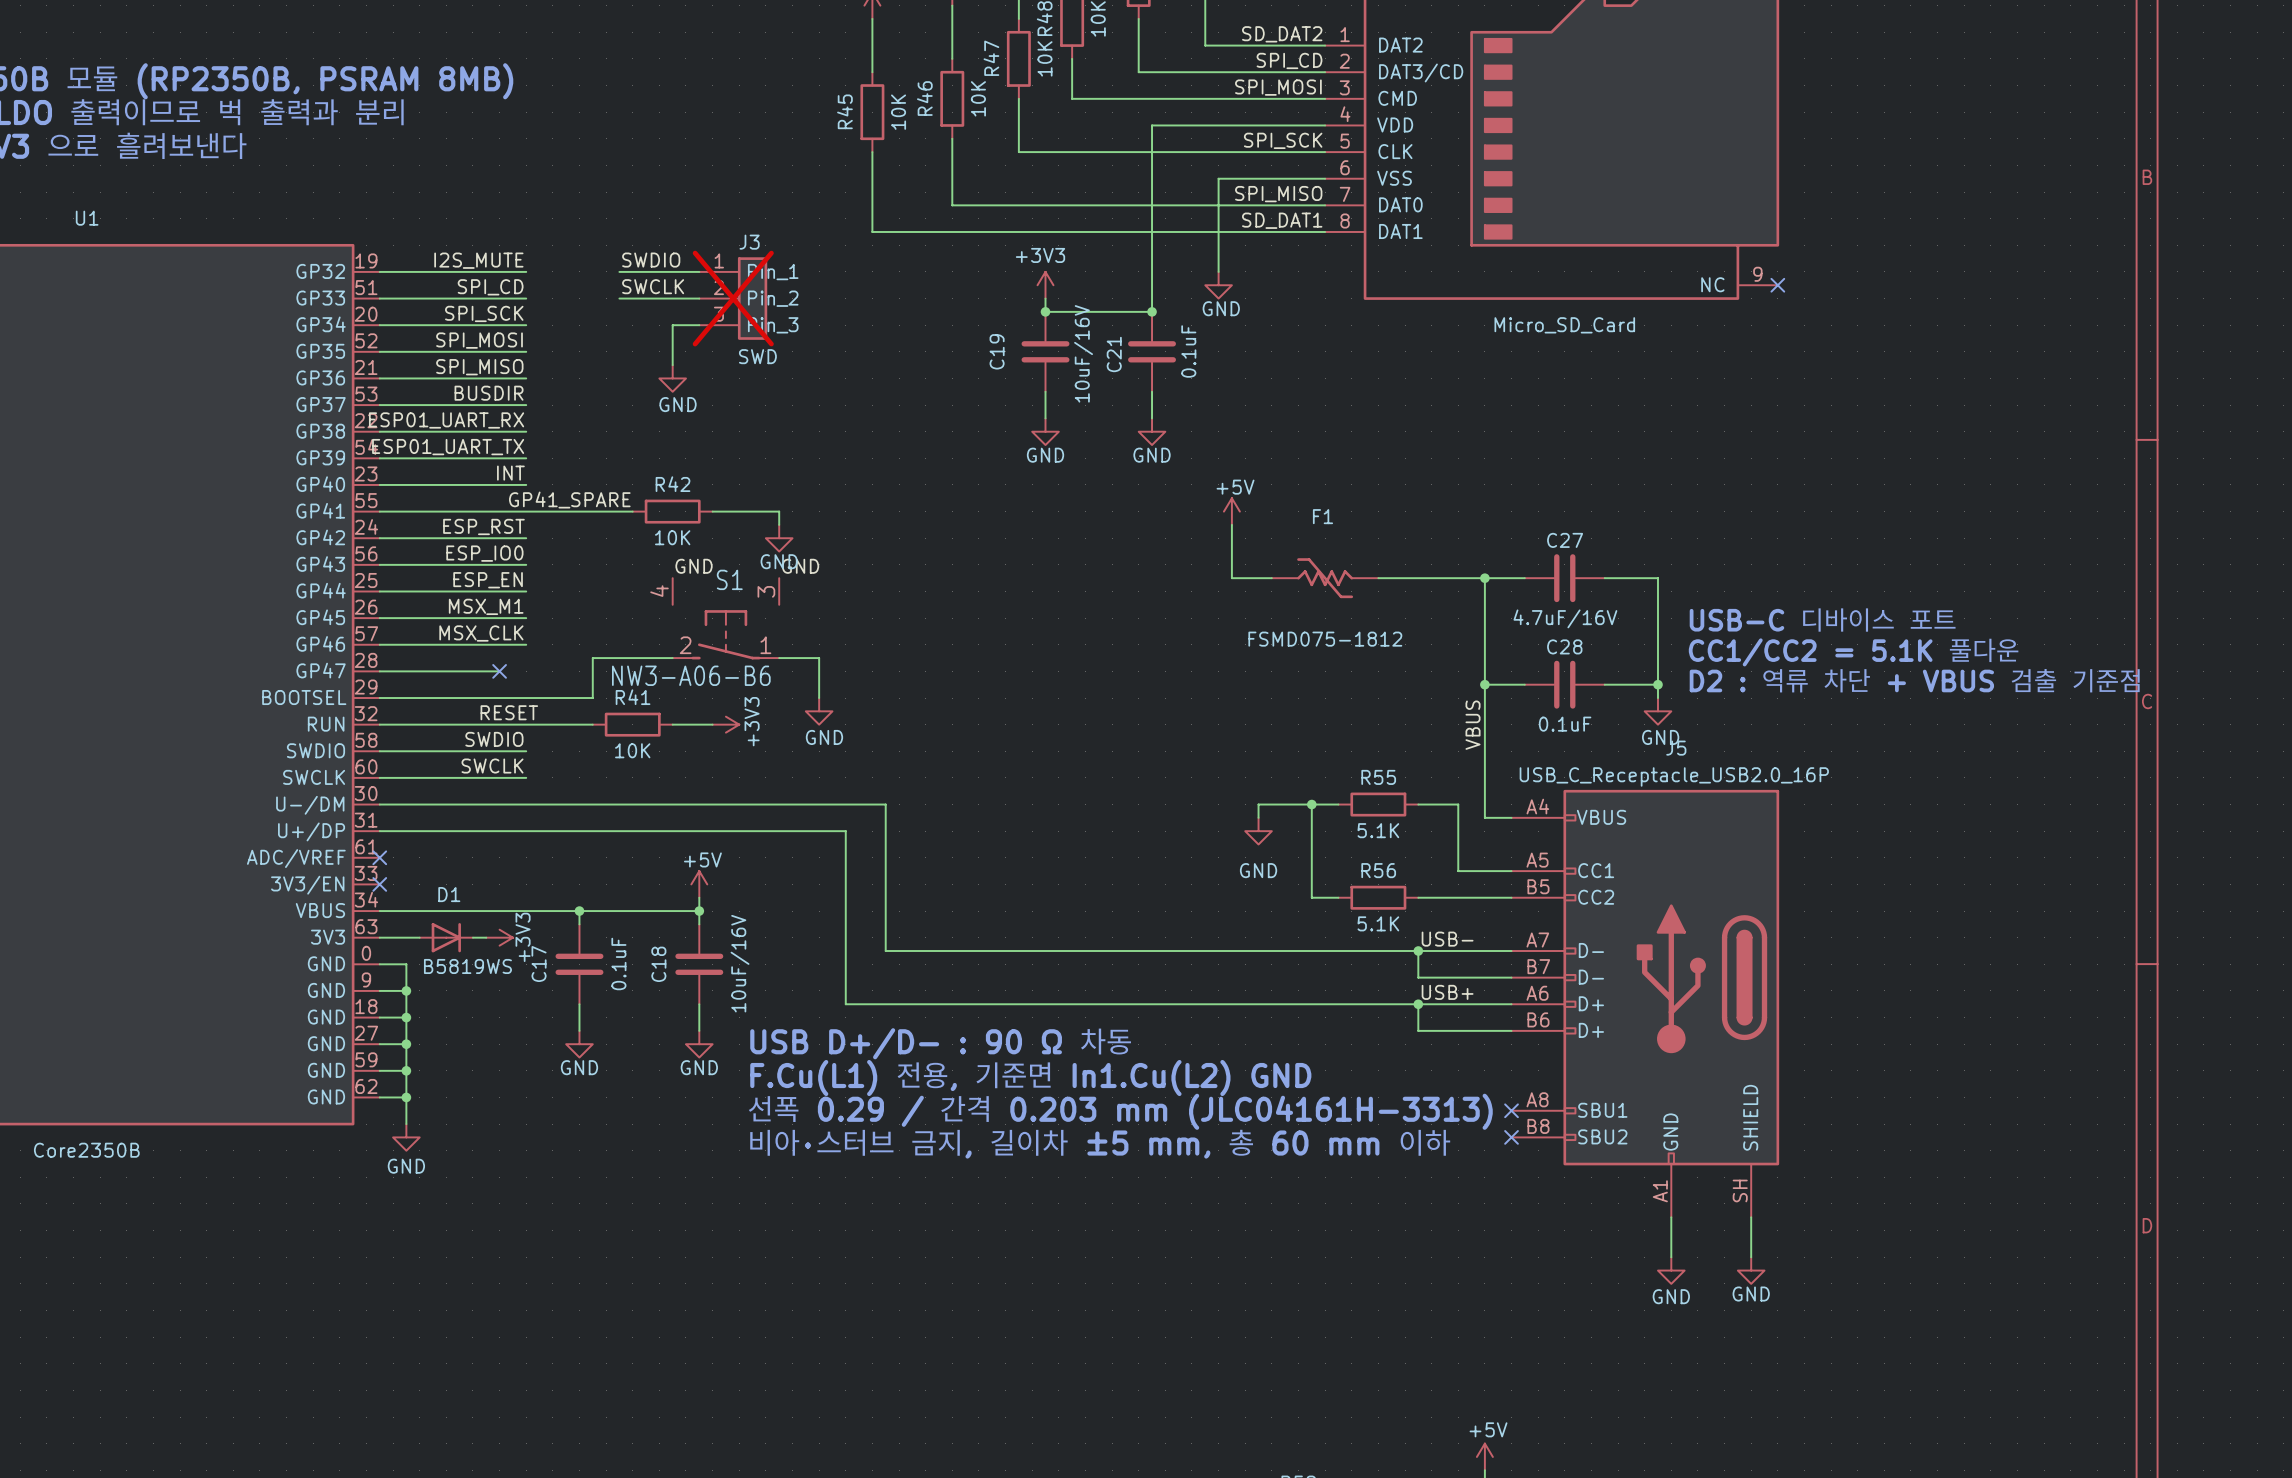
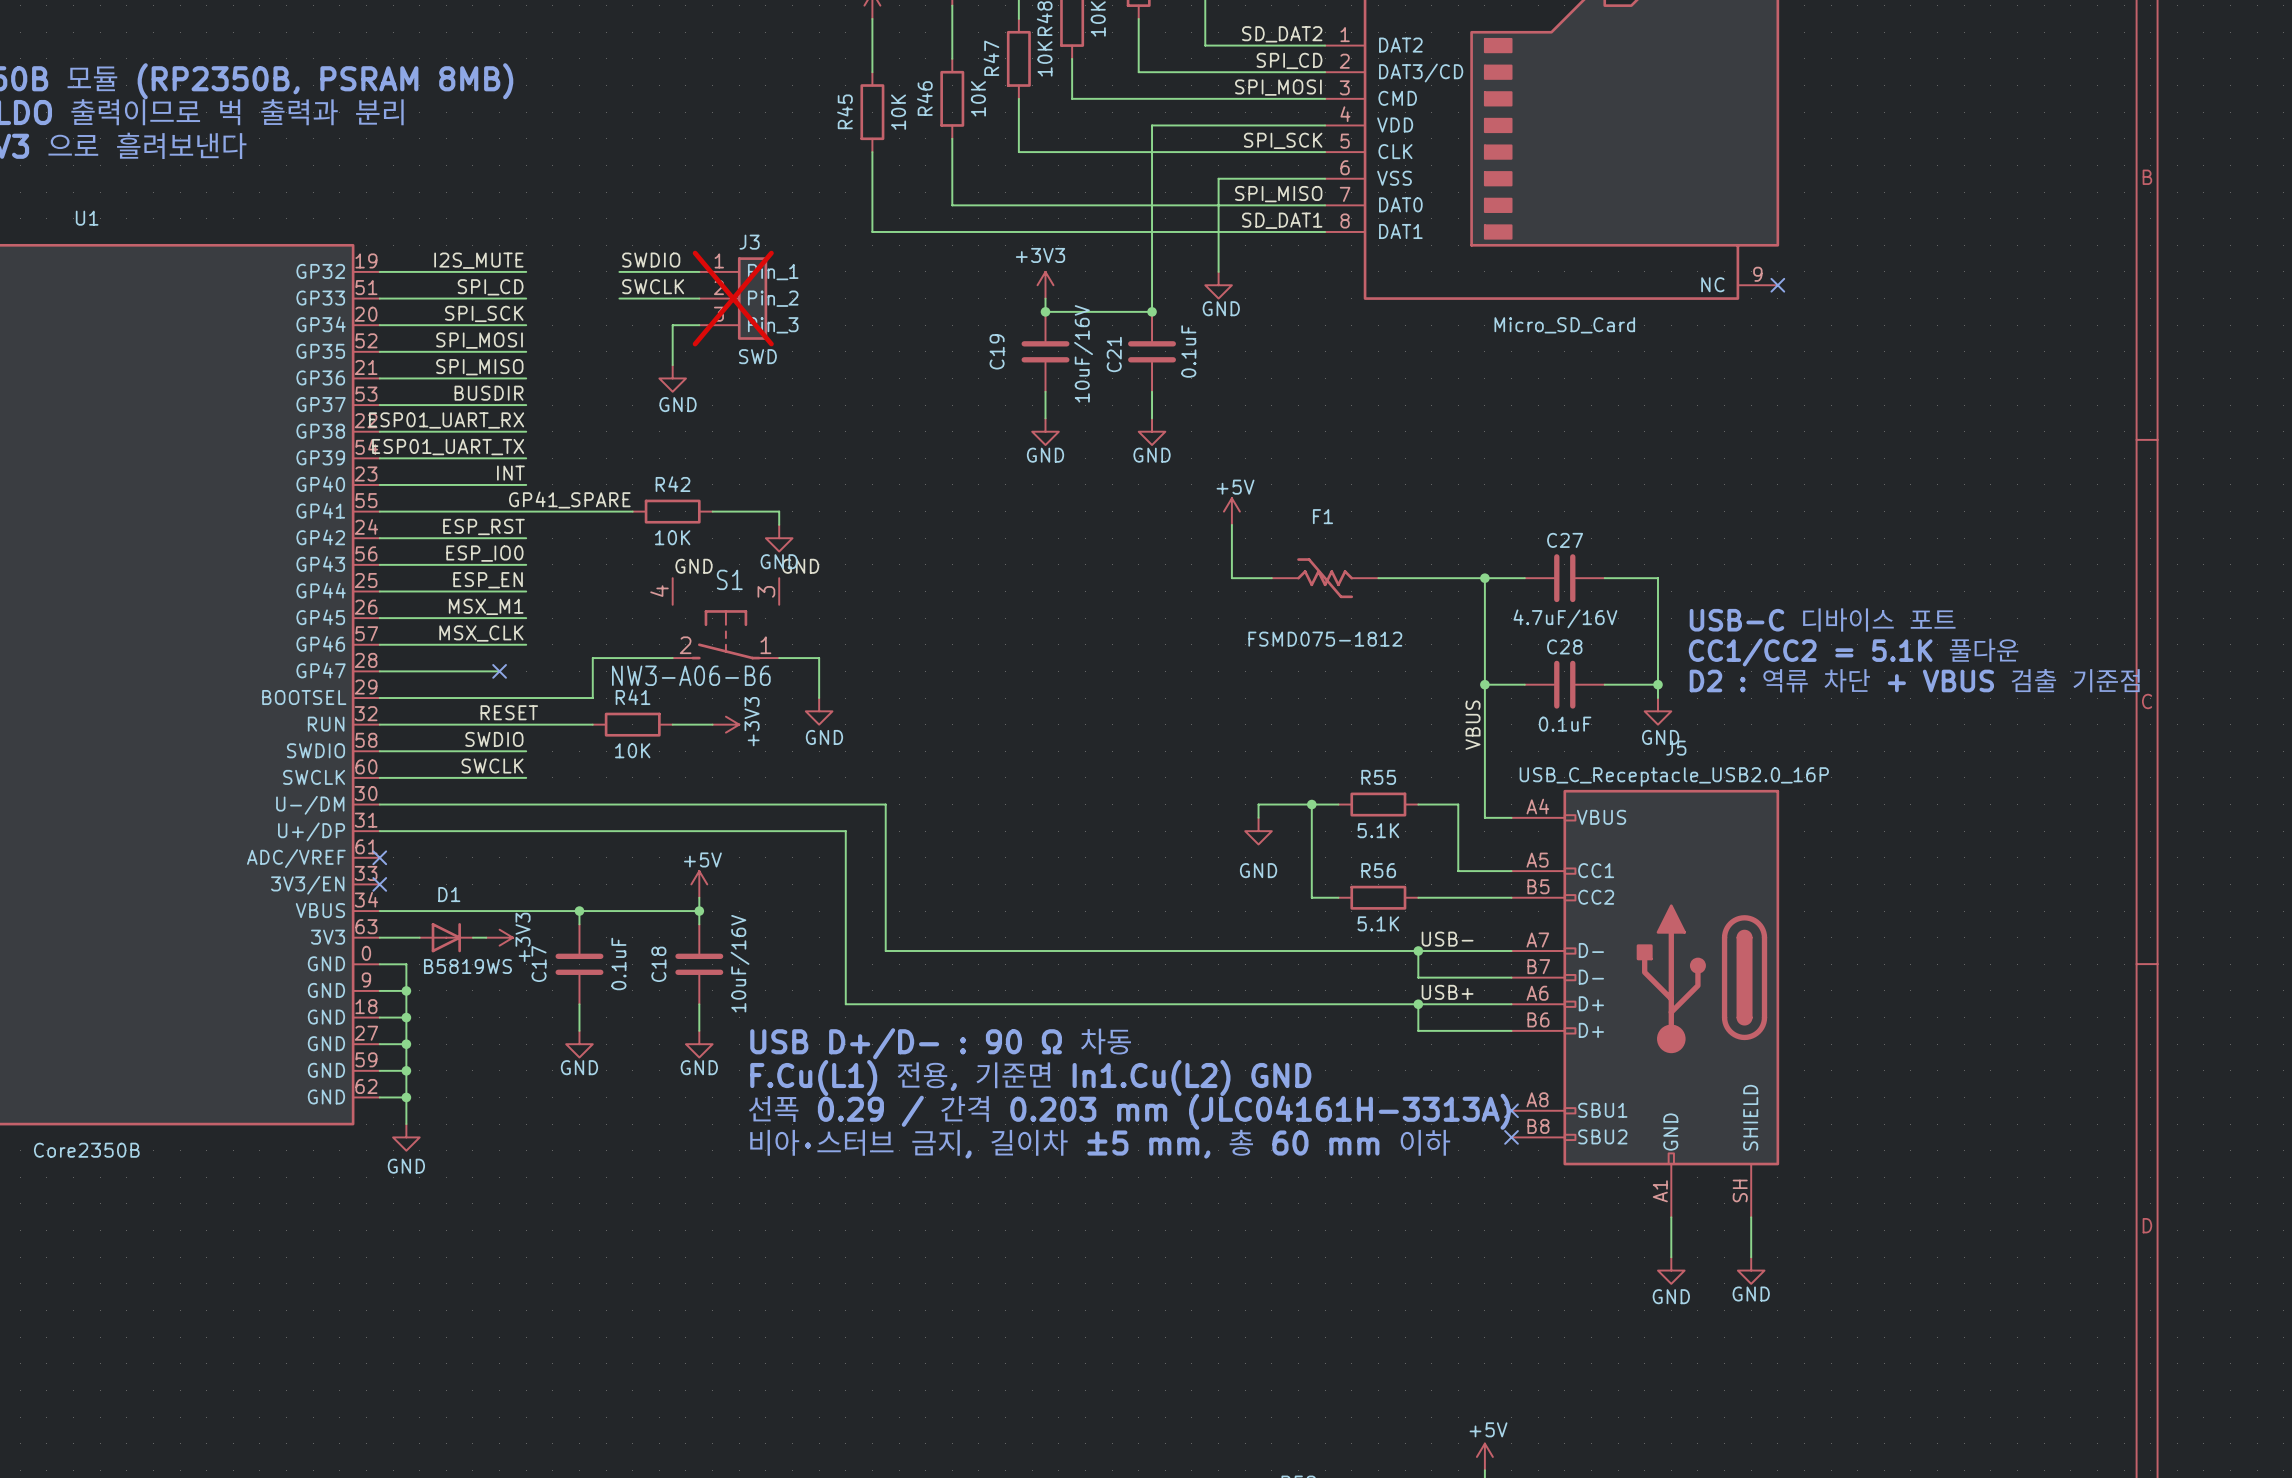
text: 선폭 0.29 / 간격 0.203 mm (JLC04161H-3313) (1119, 1111) -> 선폭 0.29 / 간격 0.203 mm (JLC04161H-3313A) (1128, 1111)

